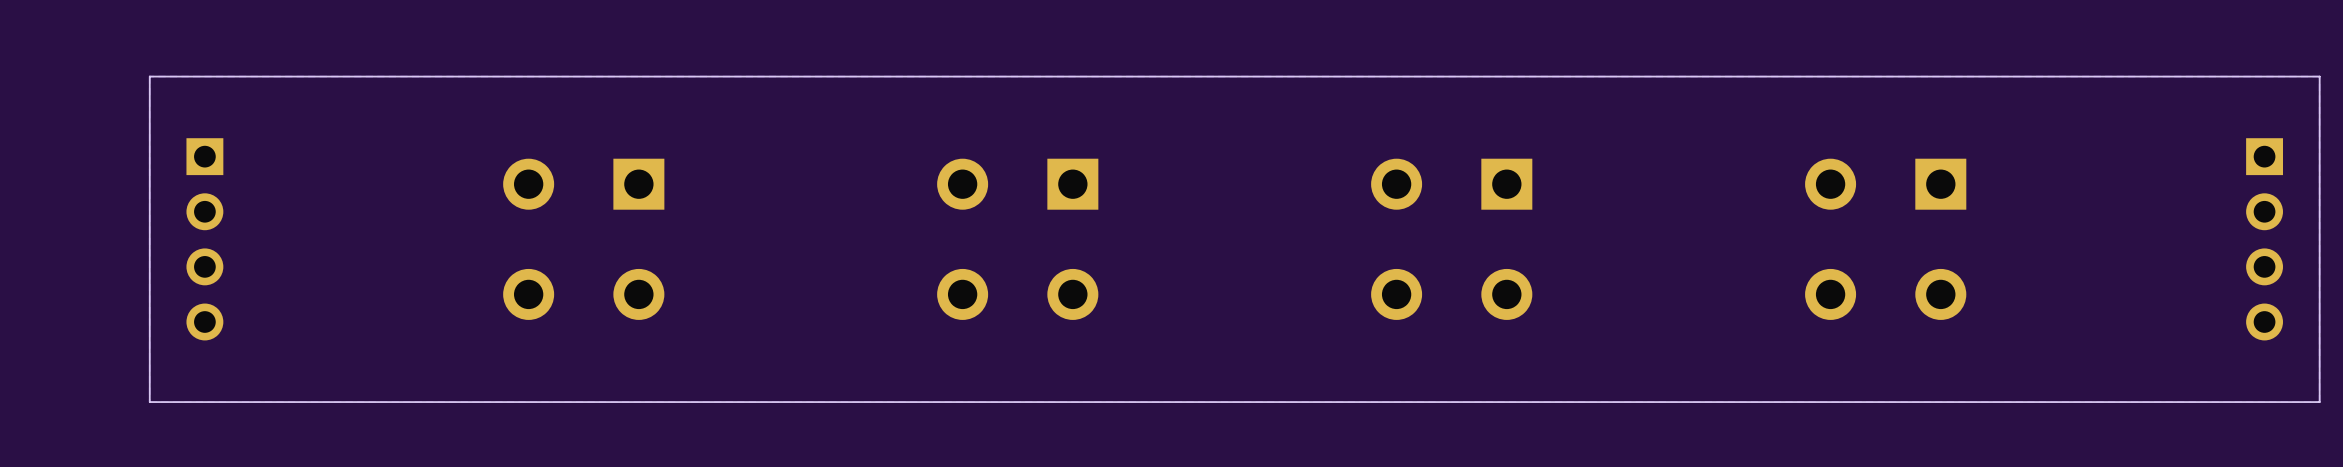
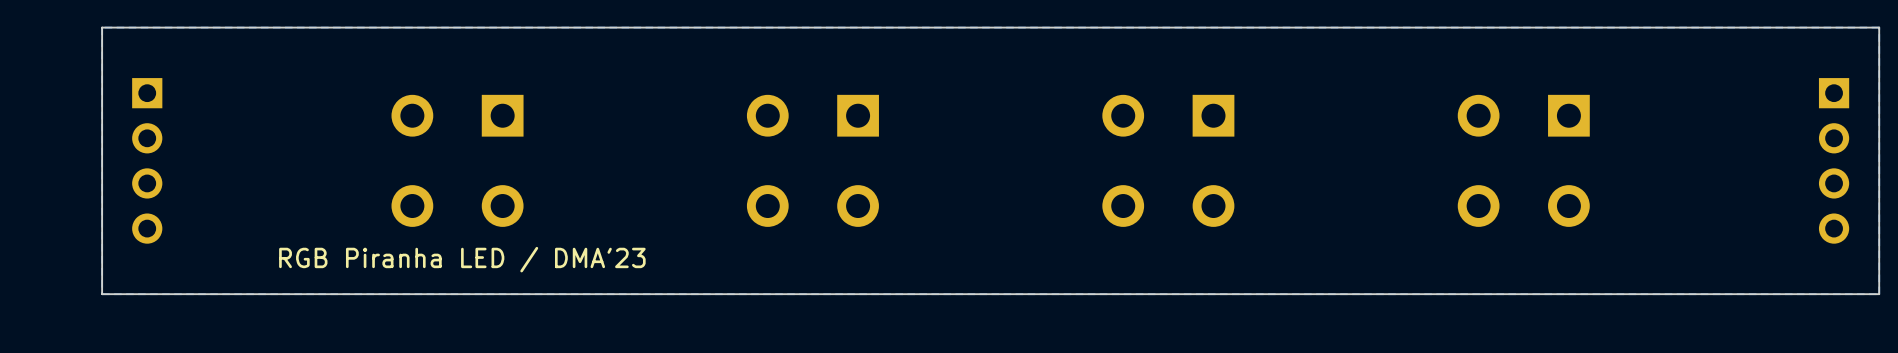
text: none -> RGB Piranha LED / DMA'23 (462, 259)

